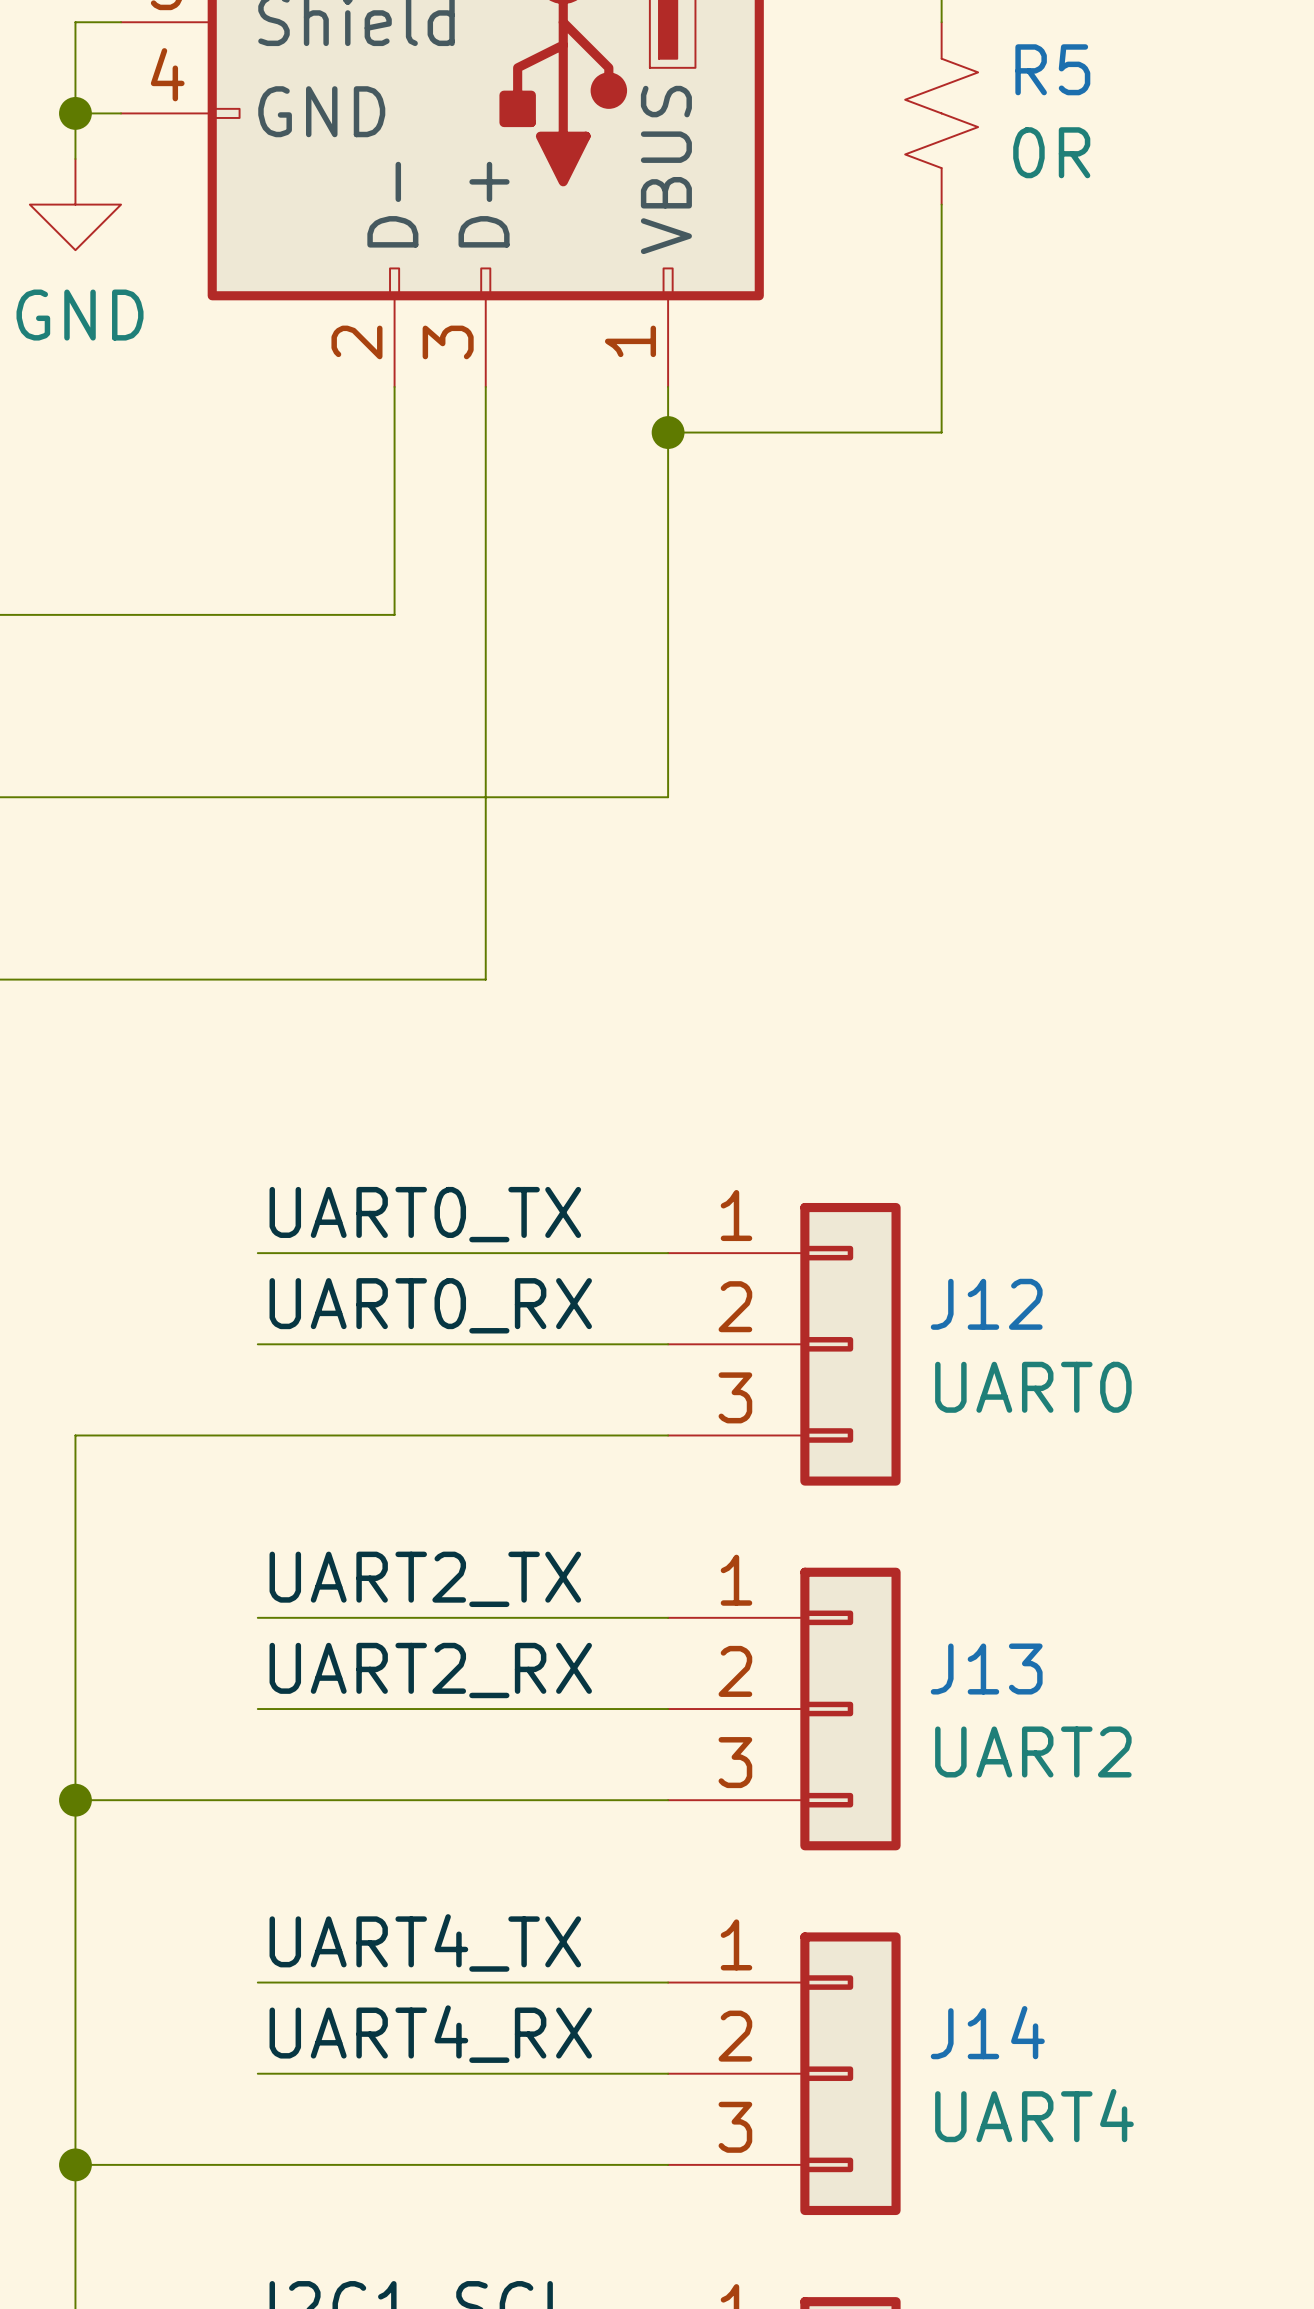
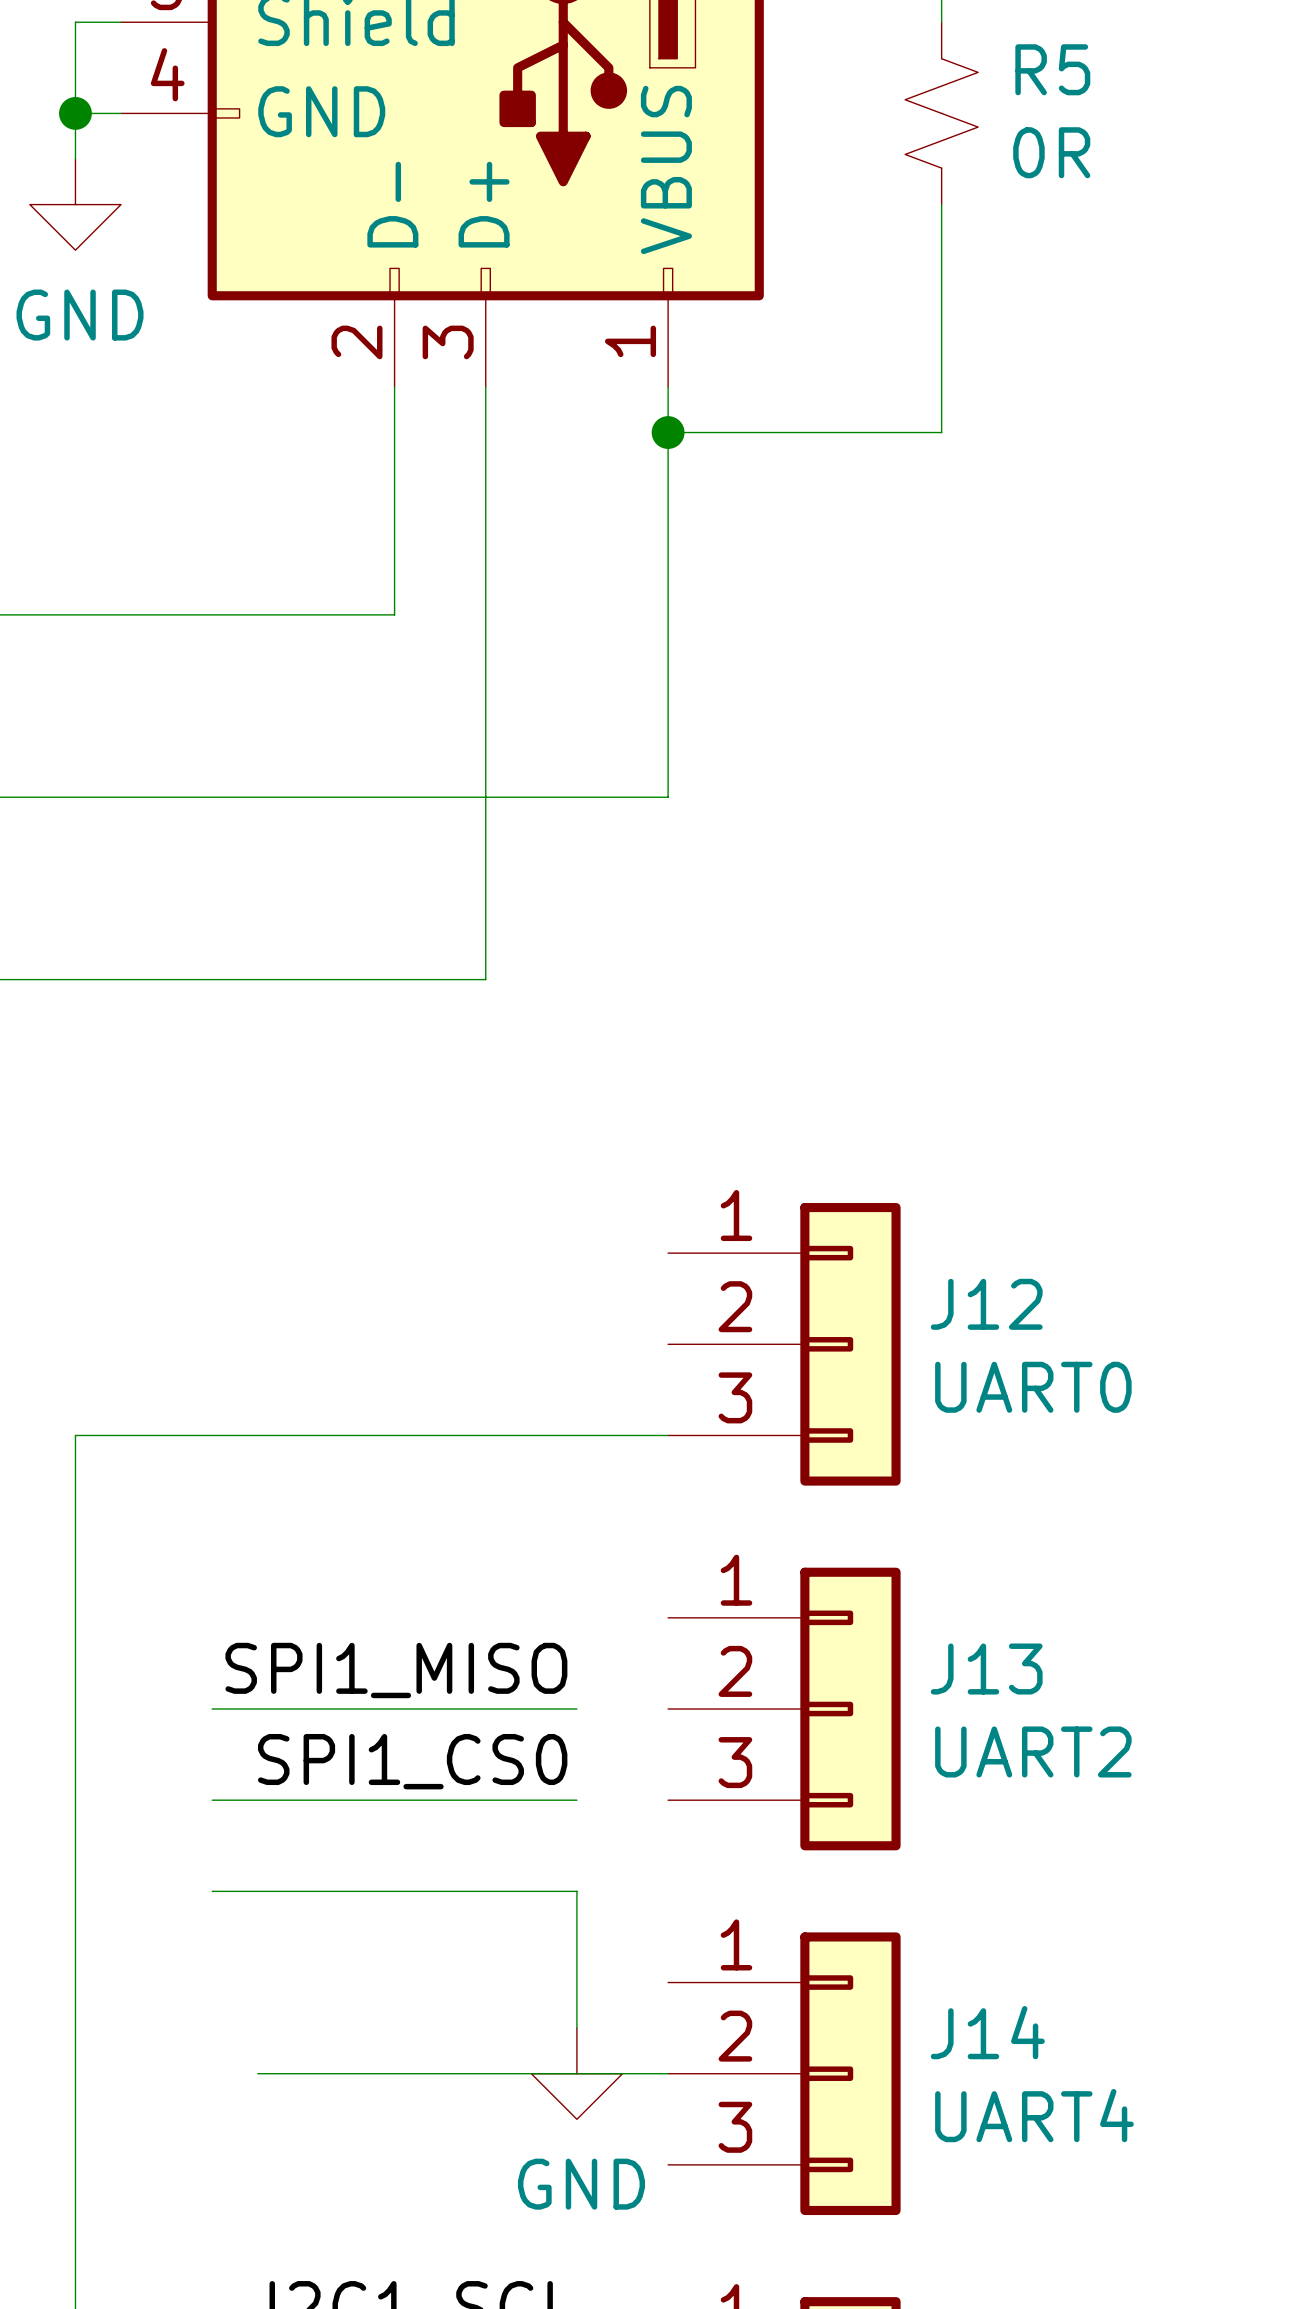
label: UART0_TX (425, 1214) -> none
wire: (257, 1253) (668, 1253) -> none
label: UART0_RX (430, 1305) -> none
wire: (257, 1344) (668, 1344) -> none
label: UART2_TX (425, 1579) -> none
wire: (257, 1617) (668, 1617) -> none
label: none -> SPI1_MISO (396, 1670)
label: UART2_RX (430, 1670) -> none
wire: none -> (212, 1709) (257, 1709)
wire: (576, 1709) (668, 1709) -> none
label: none -> SPI1_CS0 (412, 1761)
wire: (75, 1800) (212, 1800) -> none
junction: (75, 1800) -> none
wire: (576, 1800) (668, 1800) -> none
wire: none -> (212, 1891) (576, 1891) (576, 2028)
label: UART4_TX (425, 1942) -> none
wire: (257, 1982) (668, 1982) -> none
label: UART4_RX (430, 2034) -> none
power symbol: none -> GND (576, 2073)
wire: (75, 2164) (668, 2164) -> none
junction: (75, 2164) -> none

